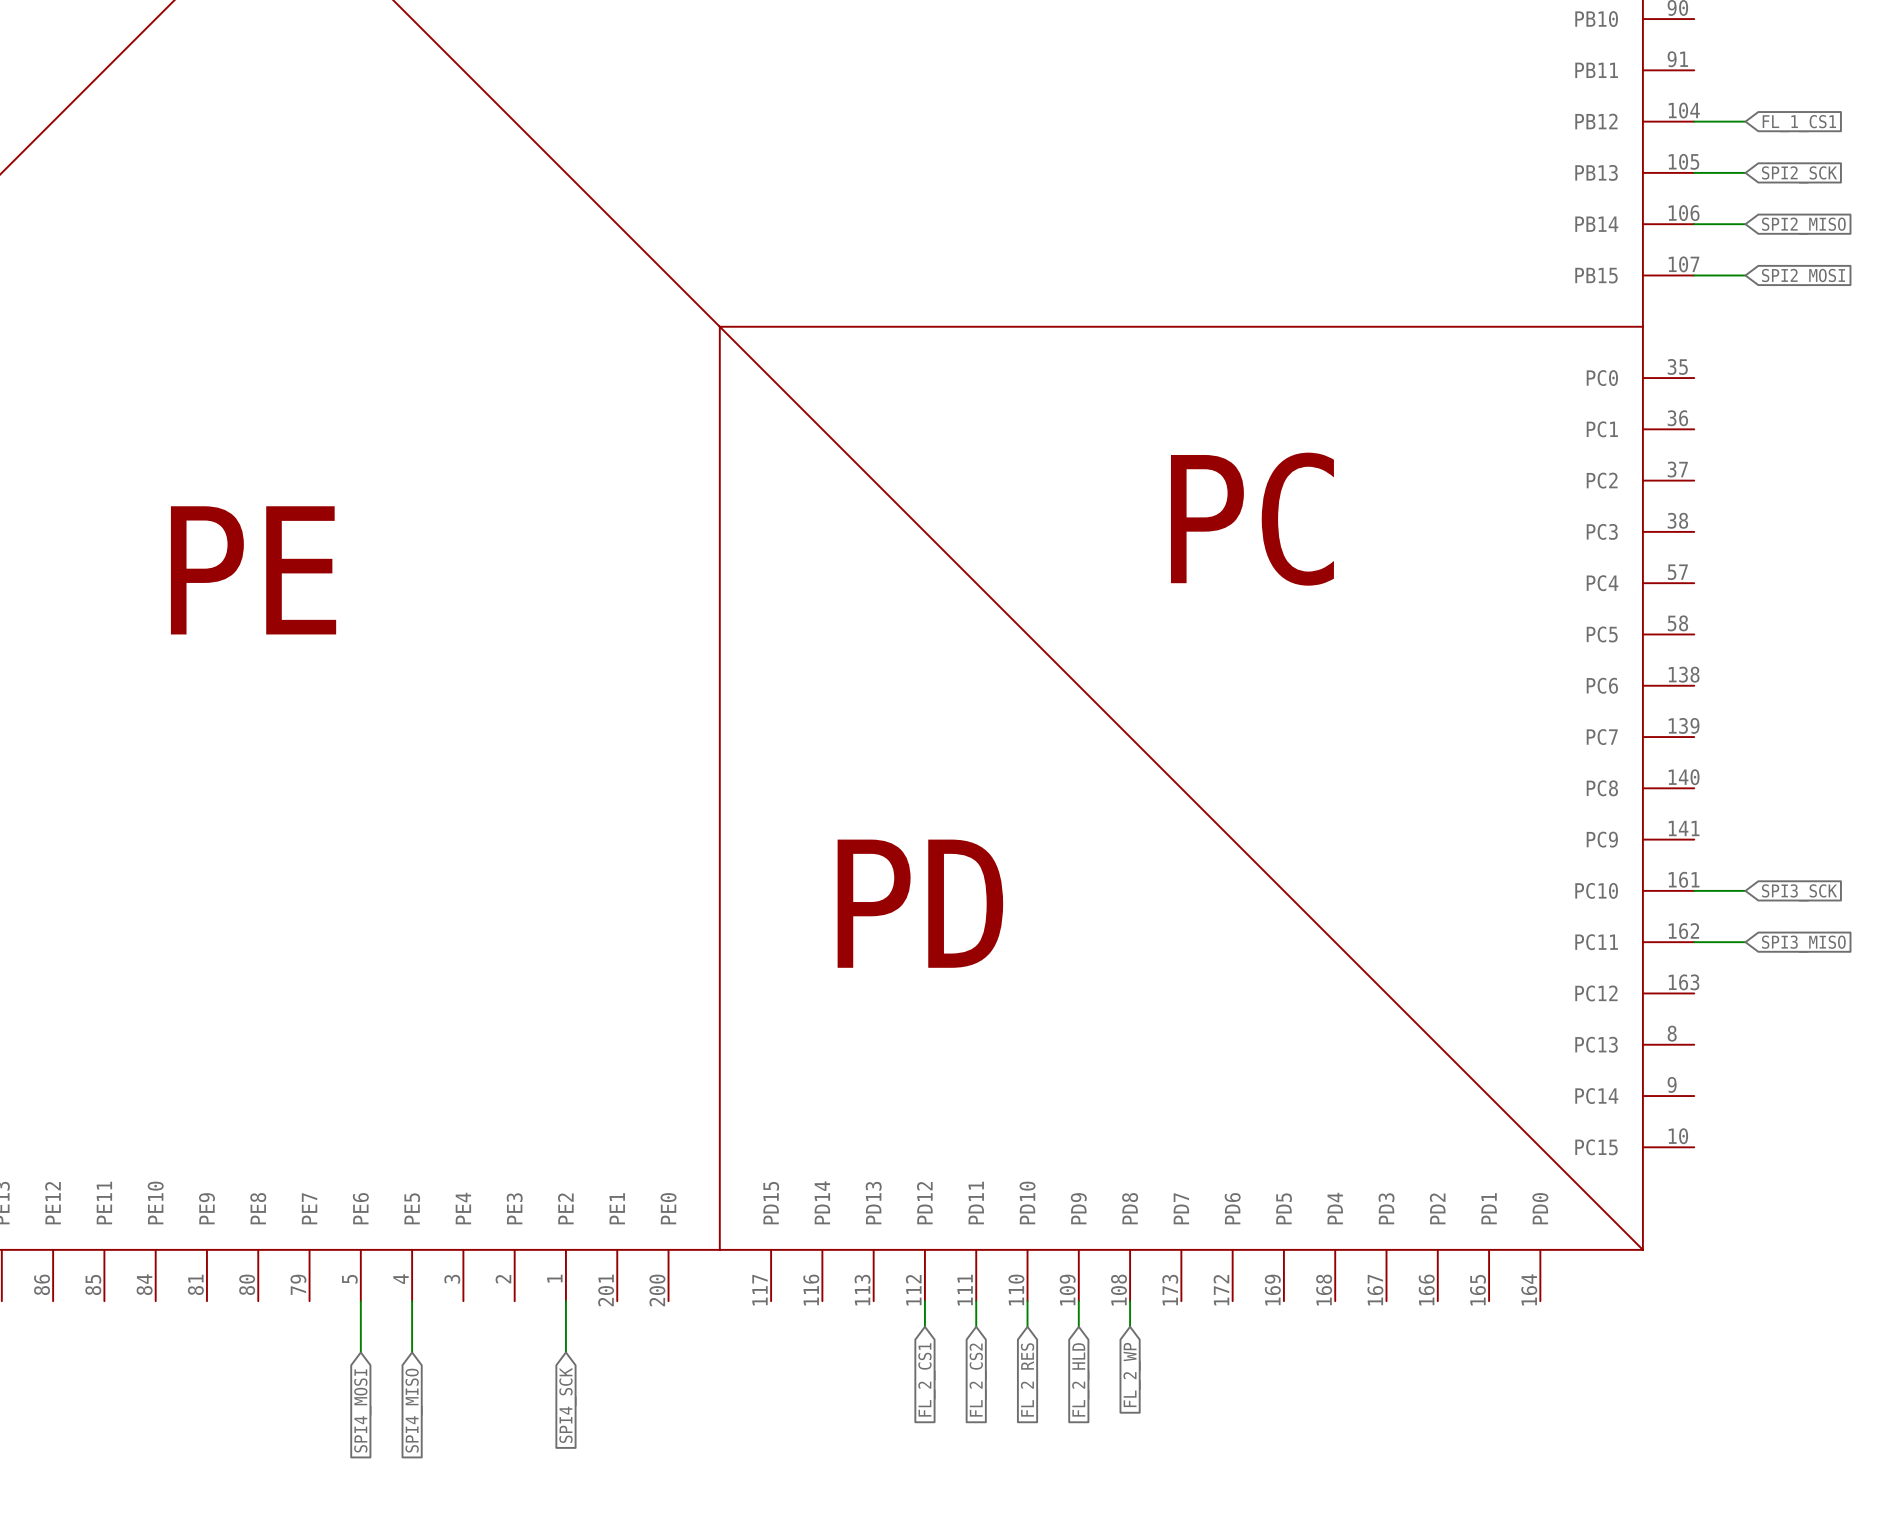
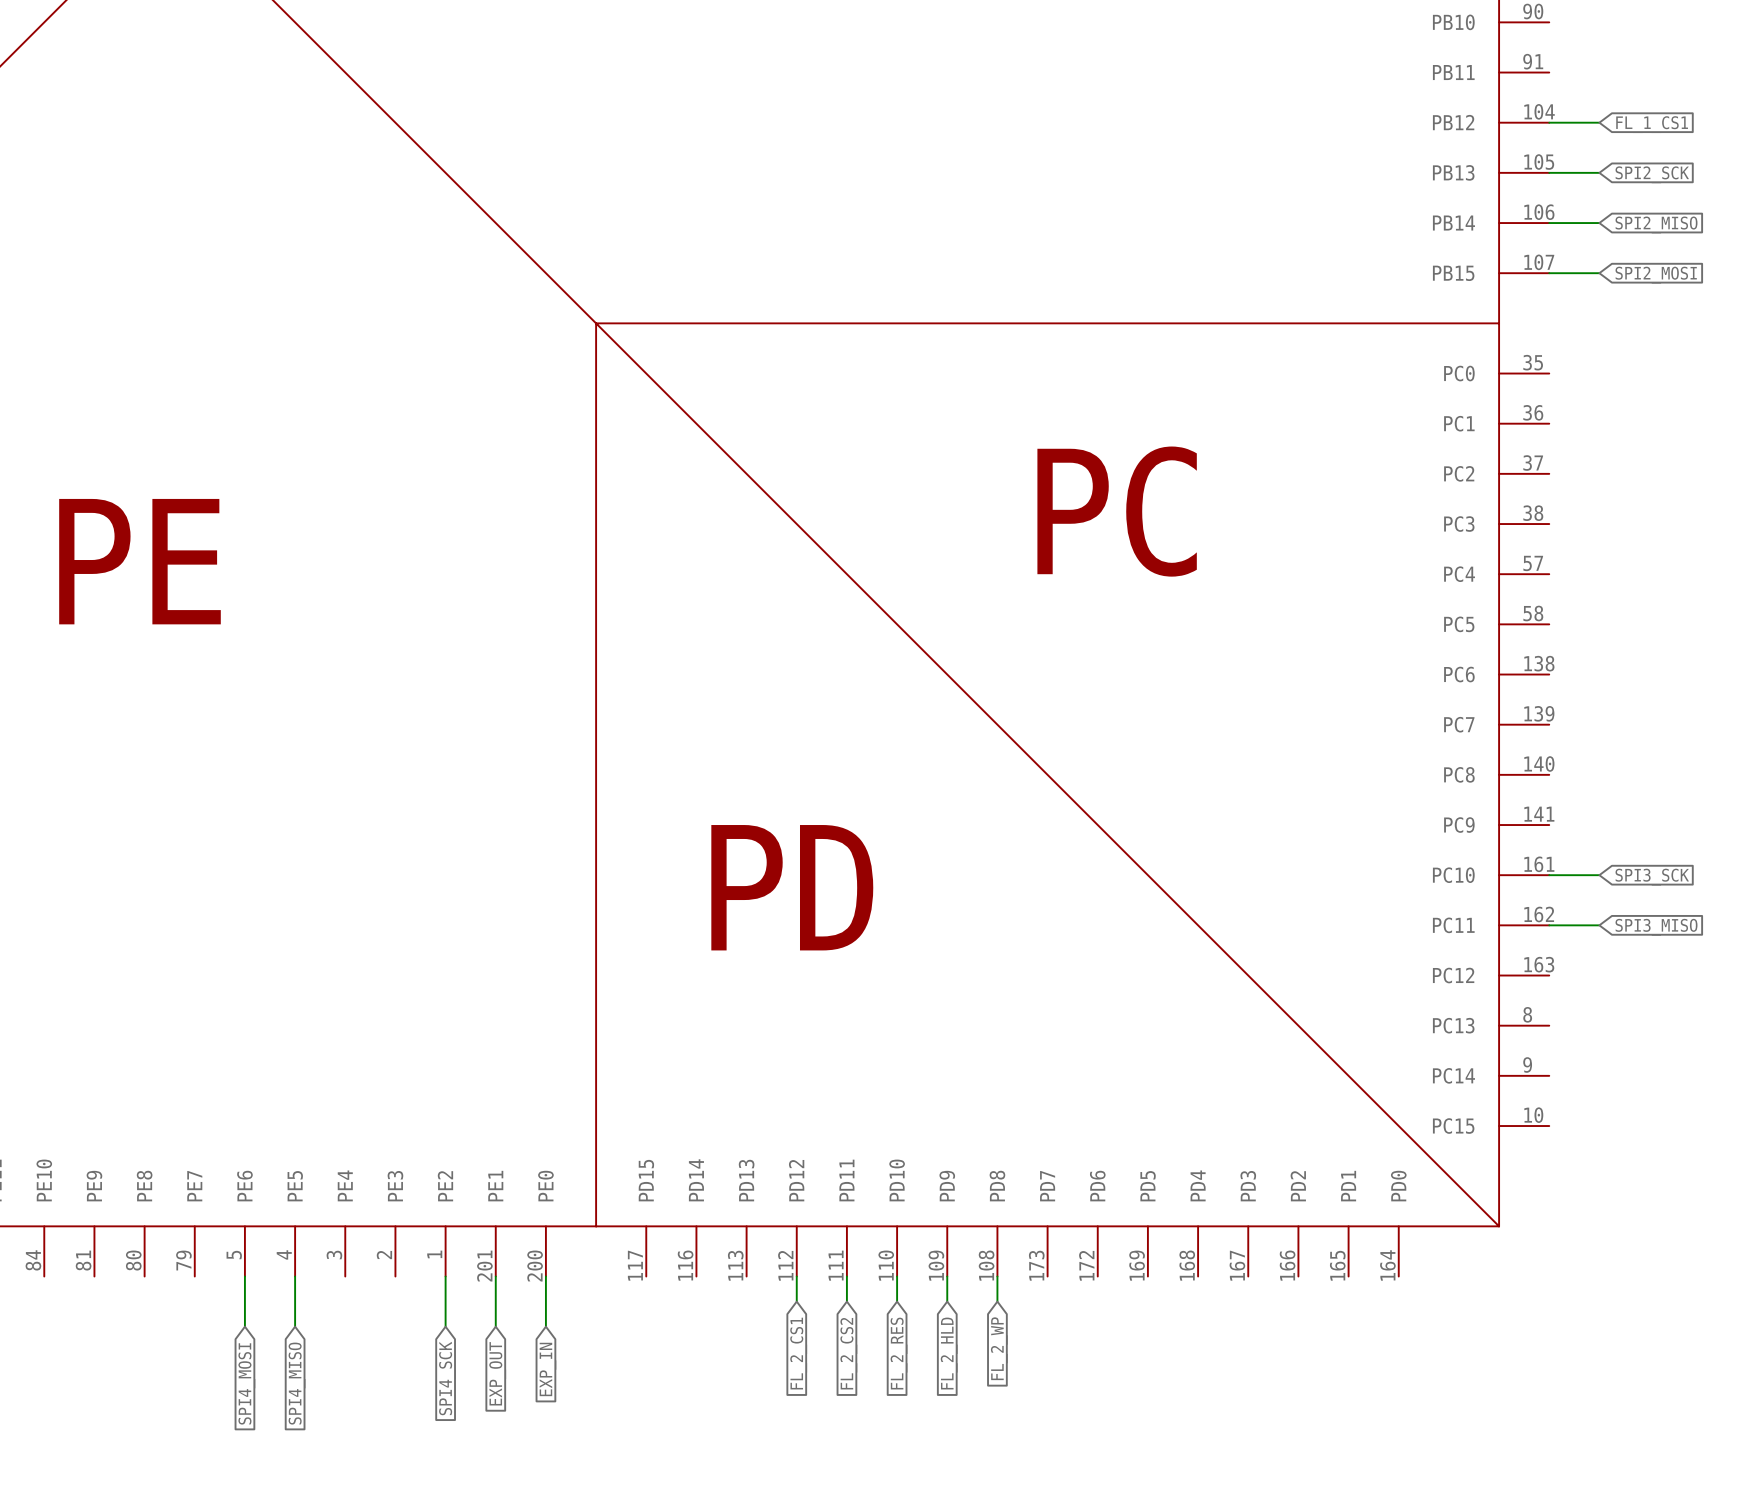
wire: none -> (495, 1276) (495, 1326)
wire: none -> (545, 1276) (545, 1326)
global label: none -> EXP_IN (547, 1369)
global label: none -> EXP_OUT (497, 1373)

